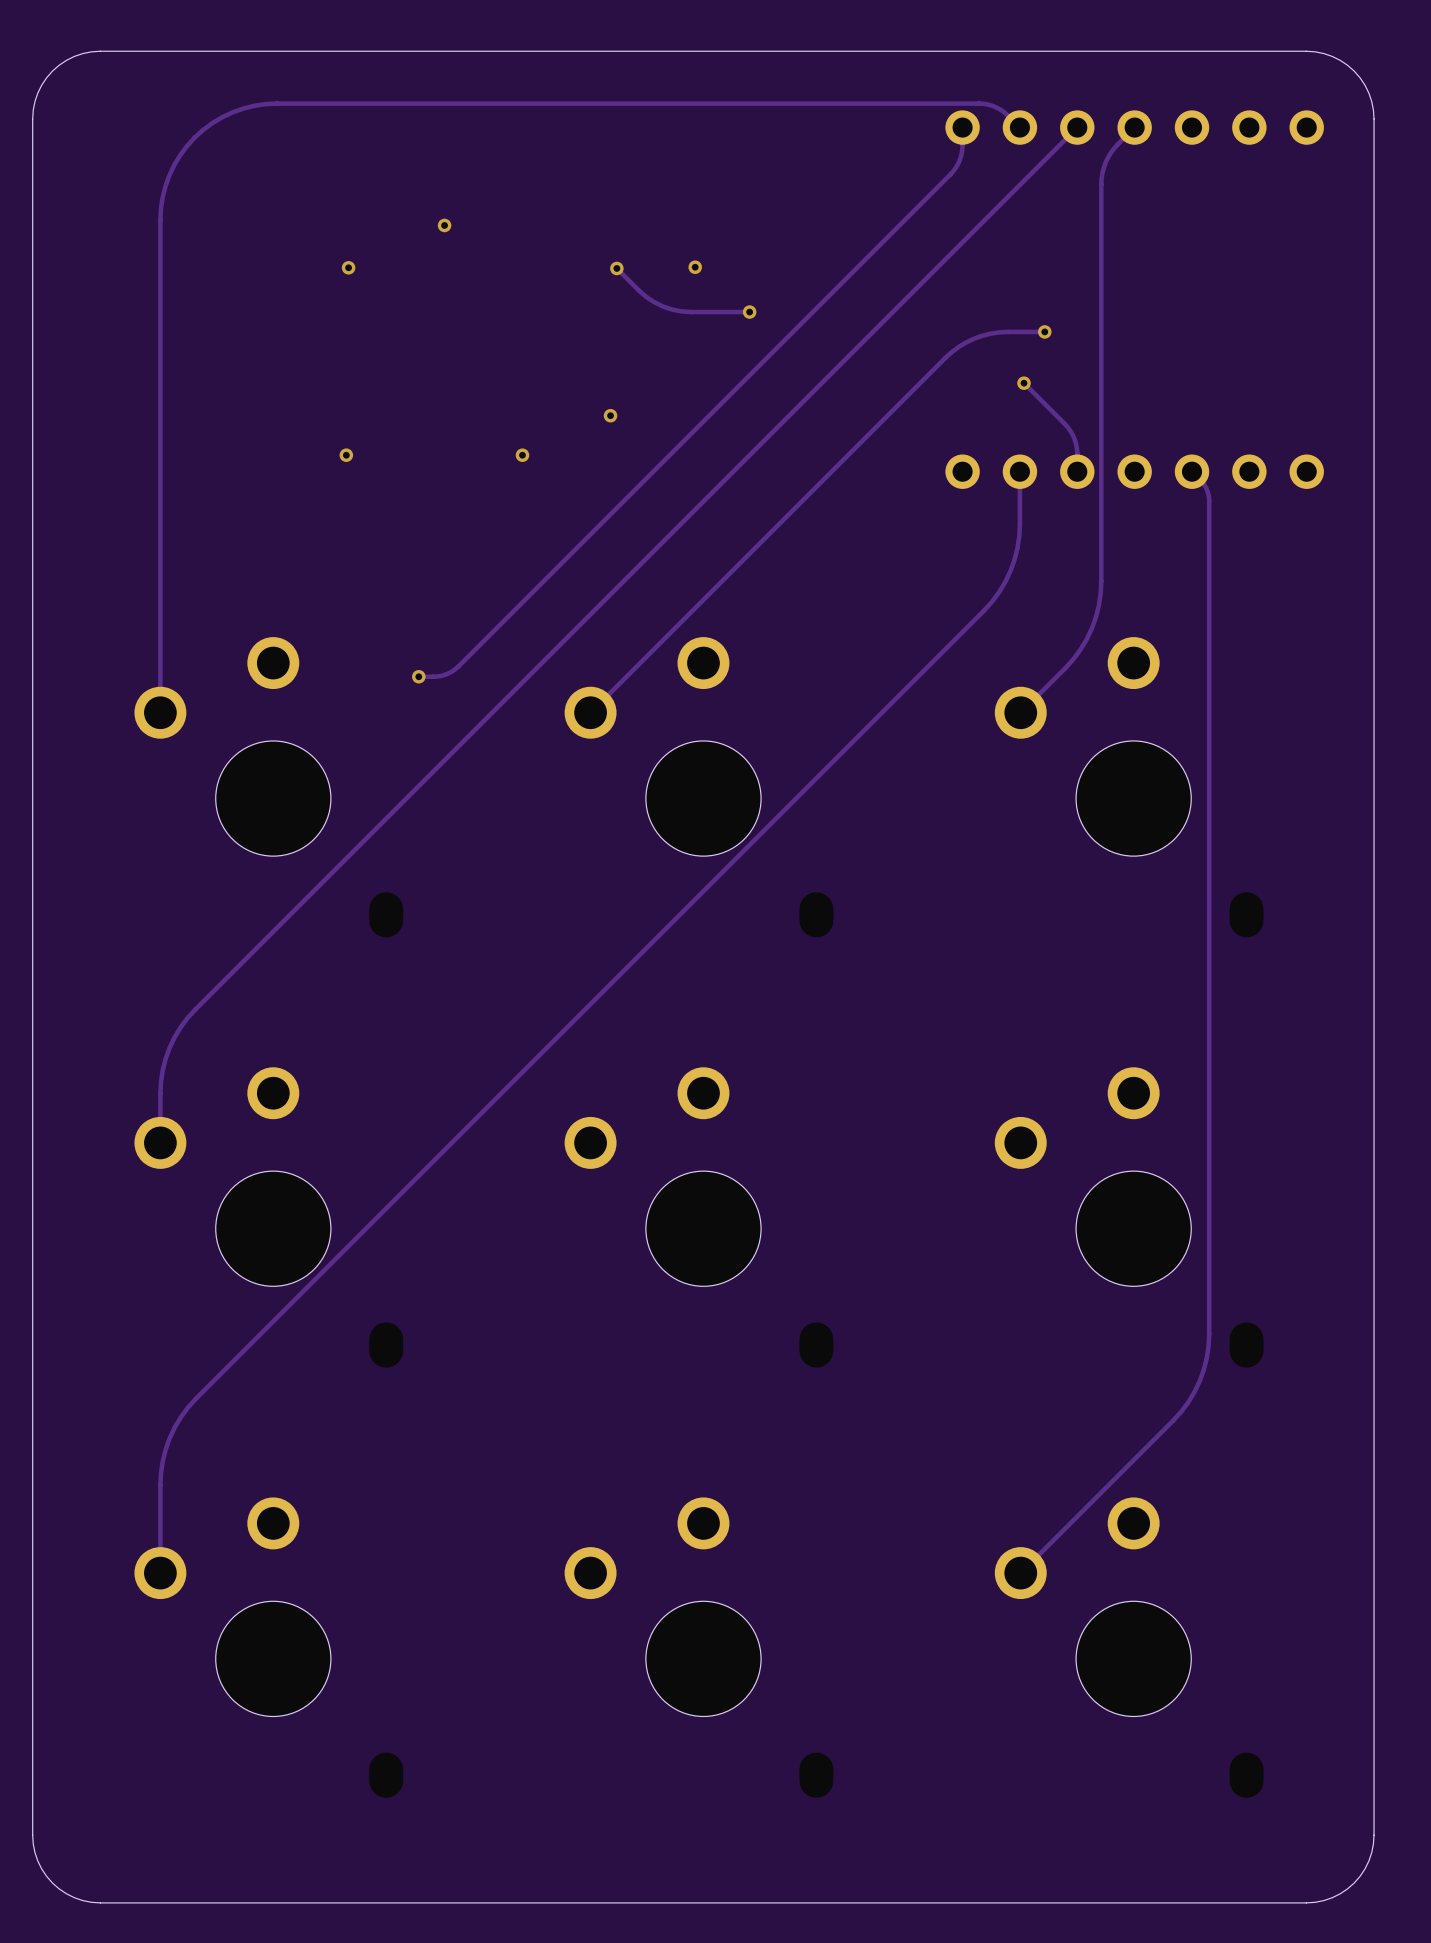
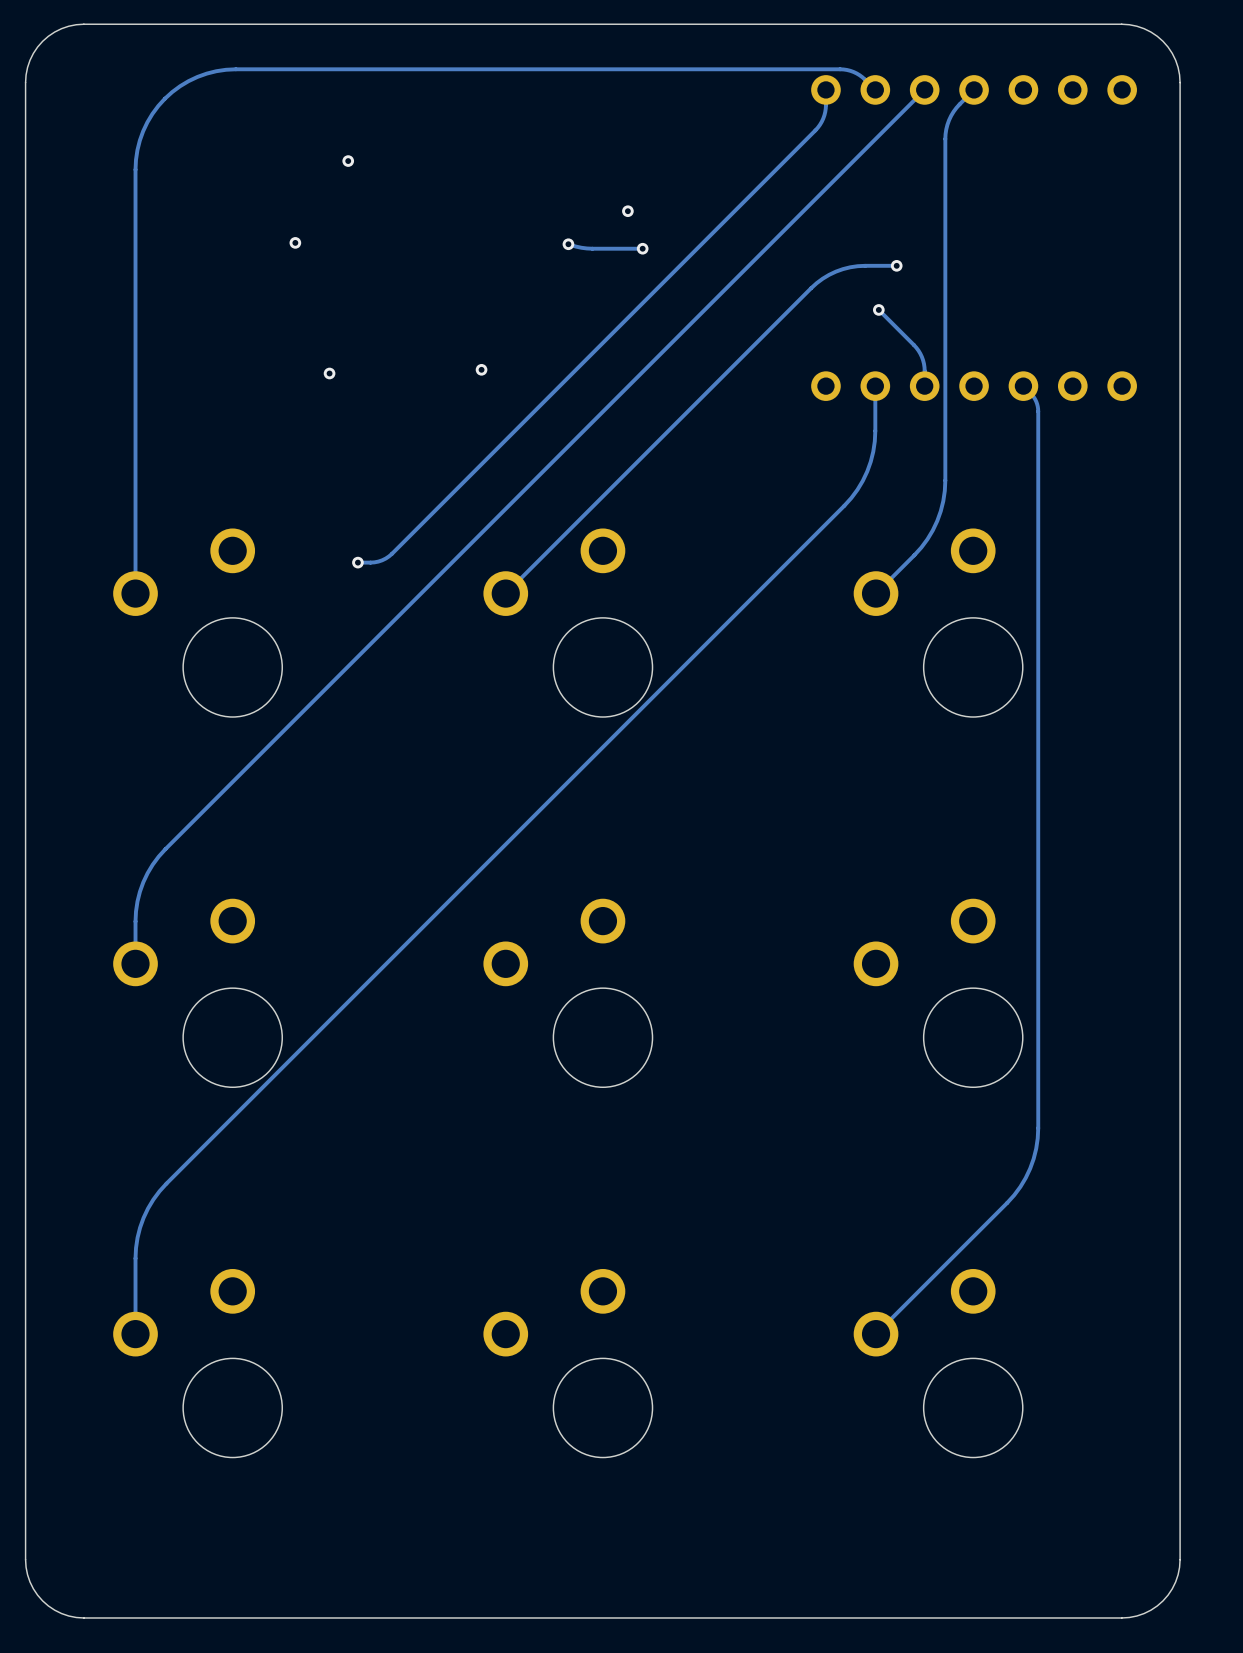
via position: (444, 225) -> (348, 161)
via position: (348, 267) -> (295, 242)
via: (695, 267) -> none
track: (616, 268) (638, 290) (654, 302) (672, 309) (691, 312) -> (568, 244) (592, 248)
via: (616, 268) -> none
via: none -> (627, 211)
via: none -> (568, 244)
via: (610, 415) -> none
via: none -> (481, 369)
via position: (346, 455) -> (329, 373)
via: (522, 455) -> none

